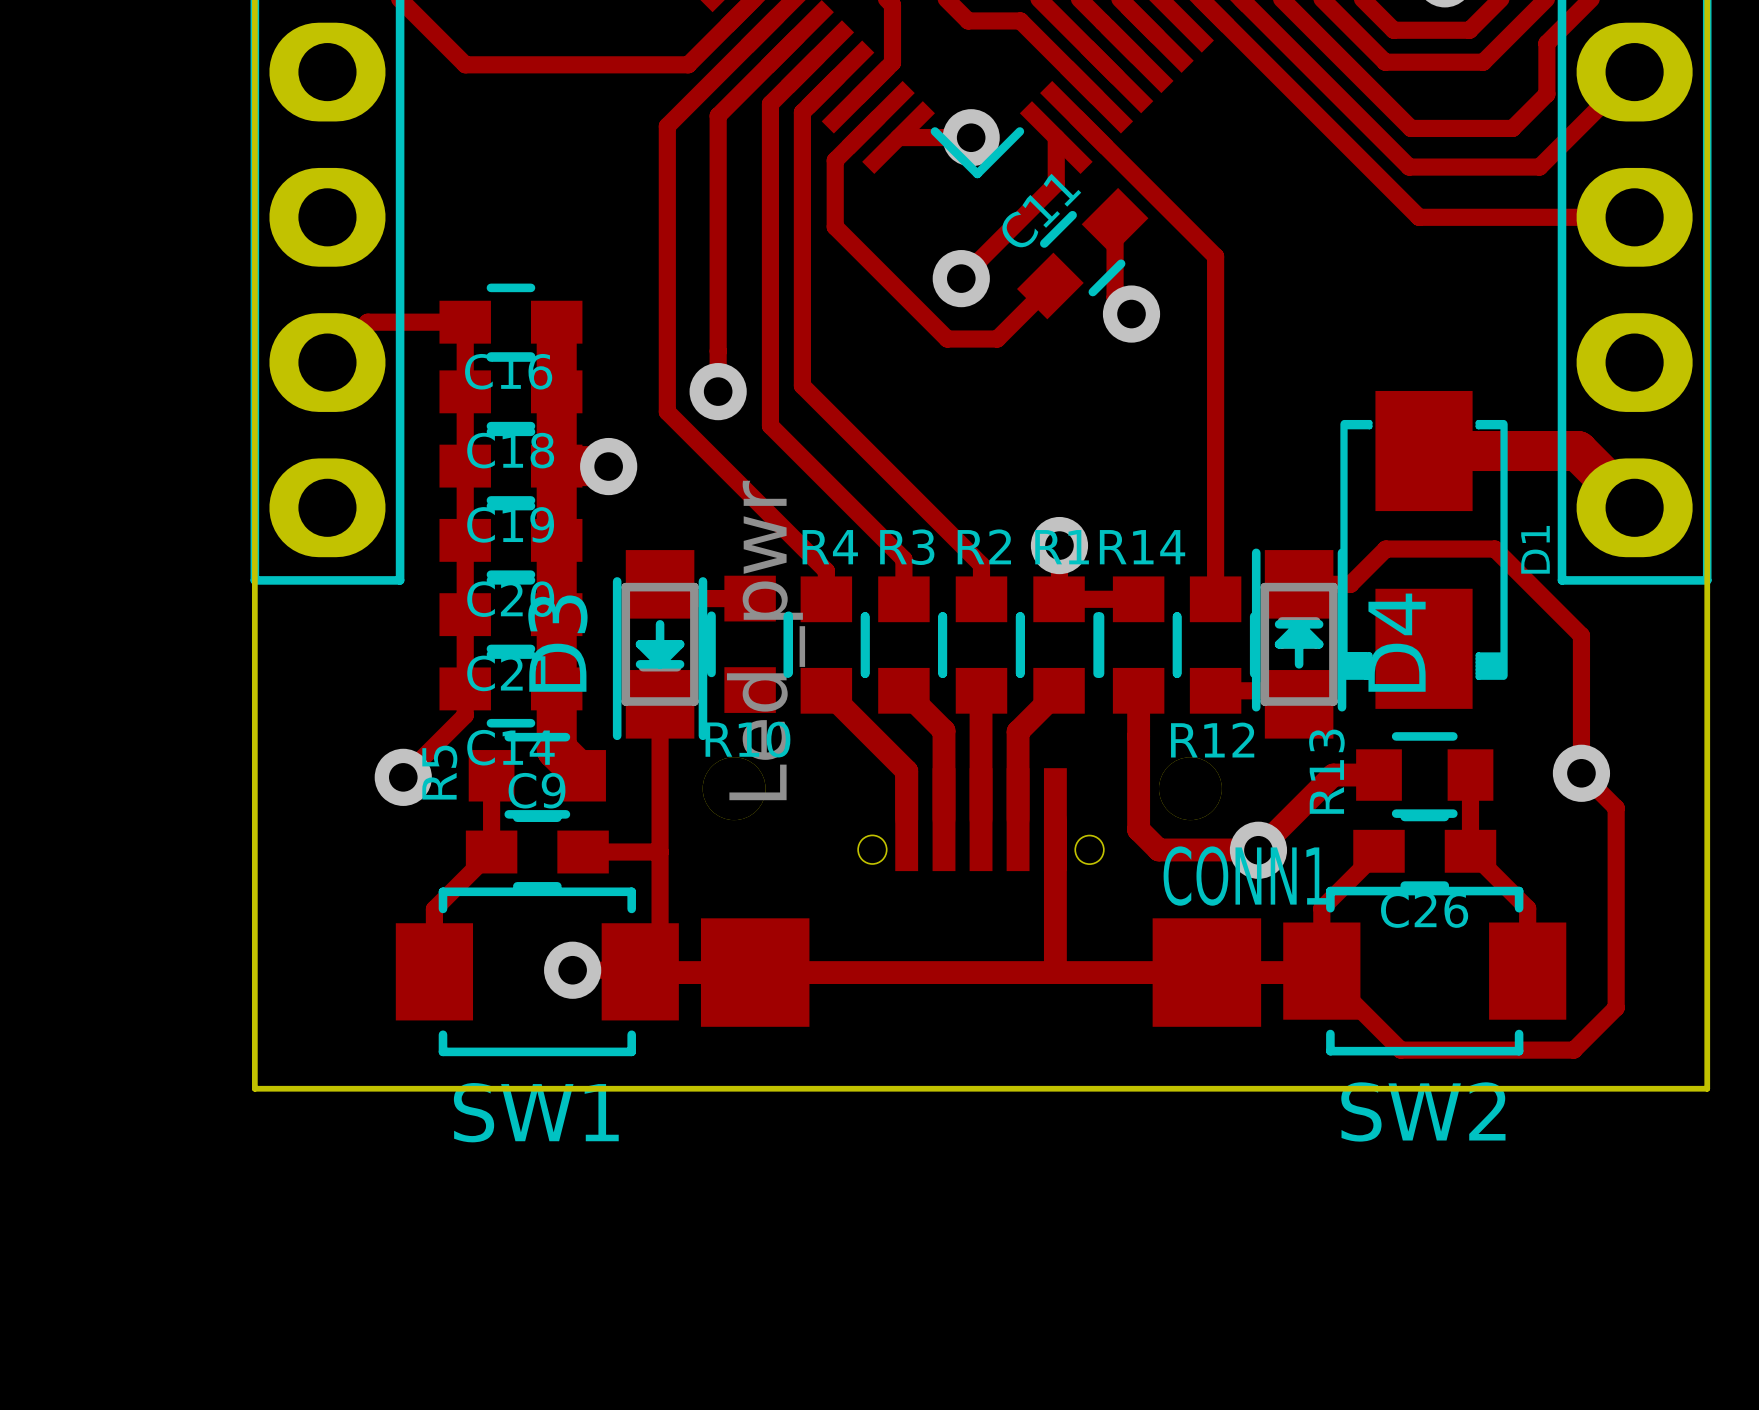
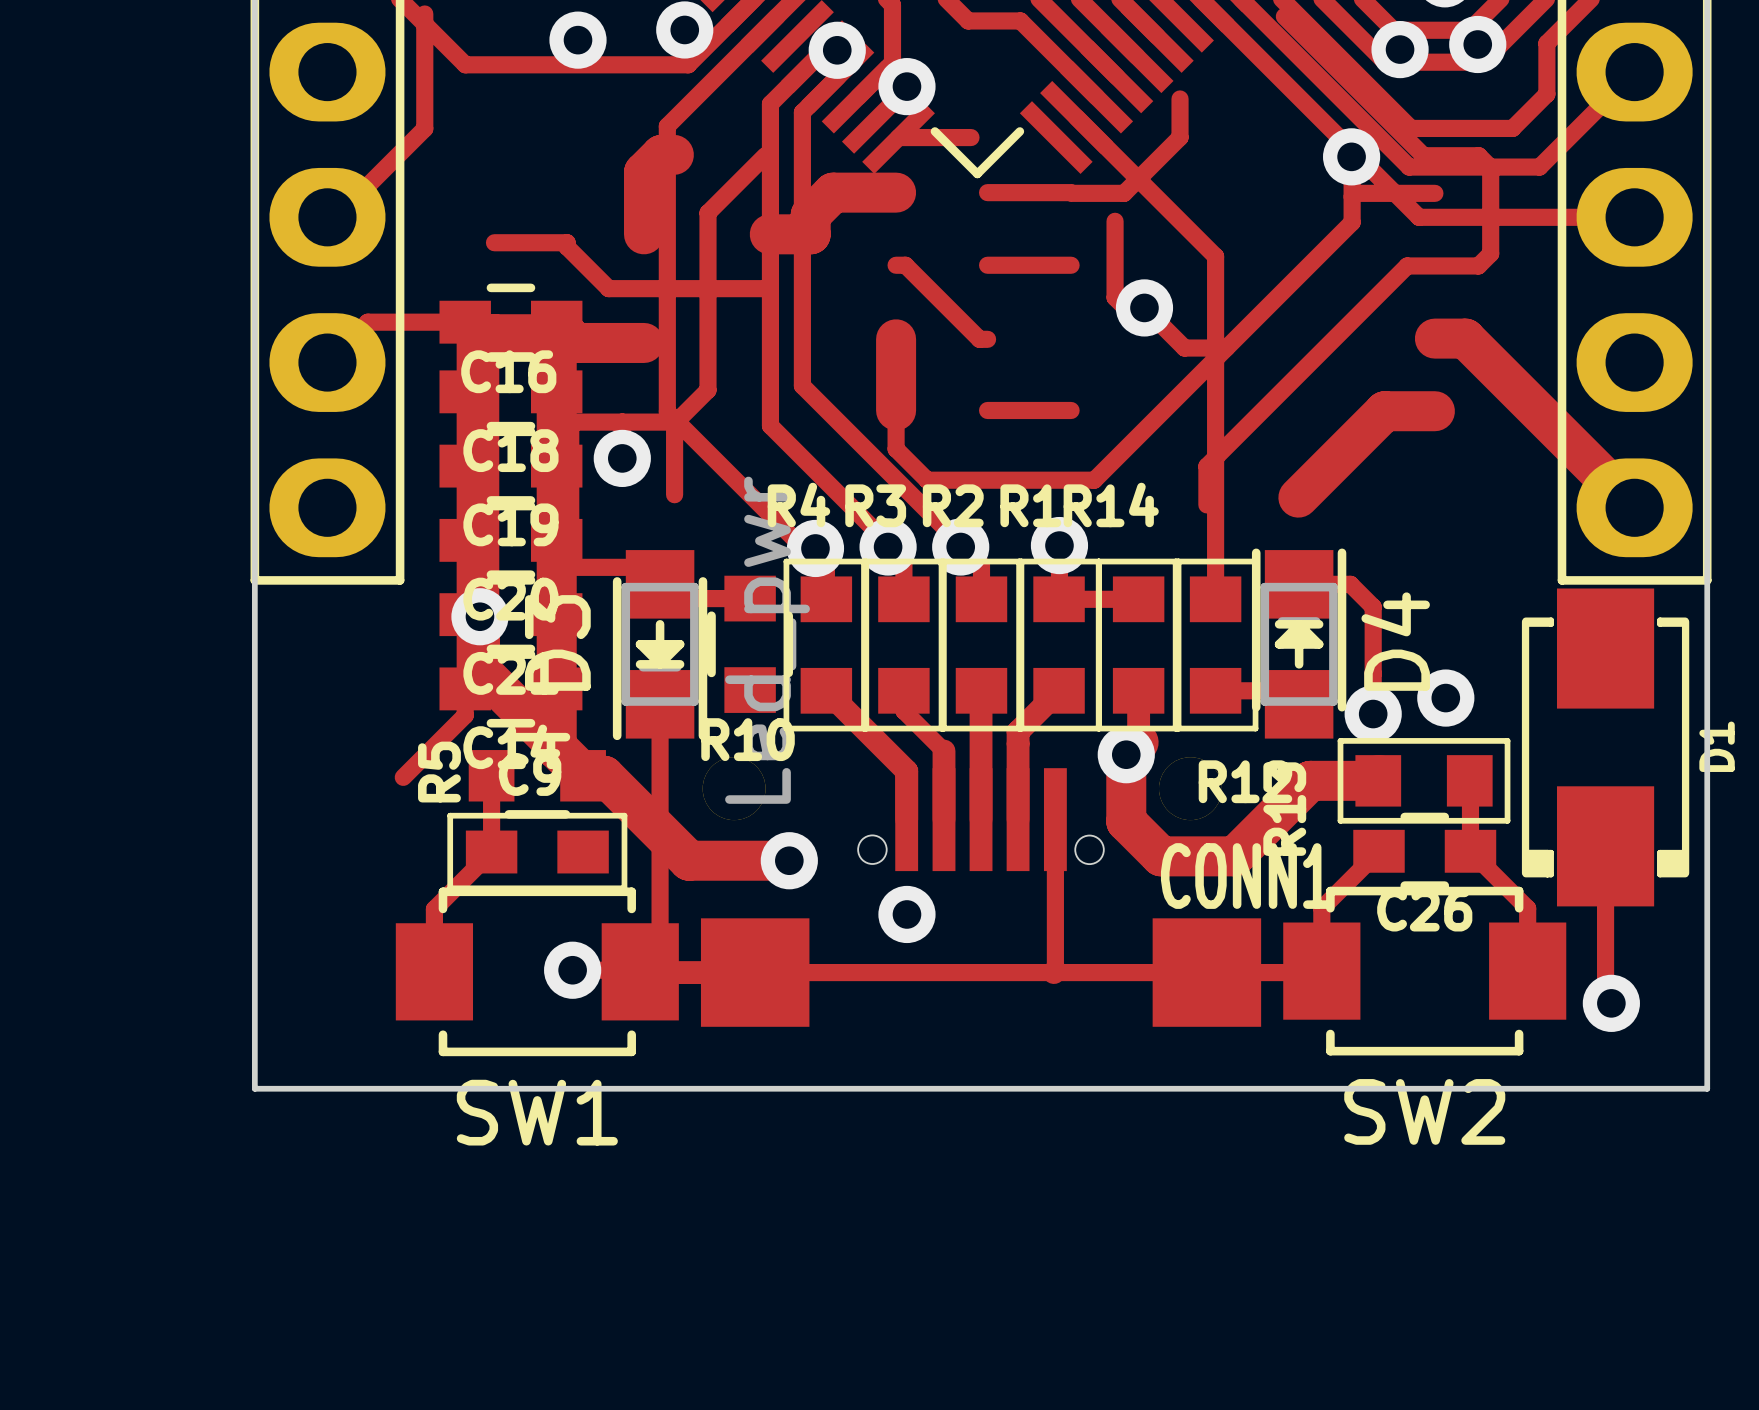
track: none -> (424, 13) (424, 128) (336, 217) (327, 217)
track: none -> (1284, 16) (1423, 155) (1478, 155) (1490, 167) (1490, 253) (1478, 265) (1407, 265) (1206, 466) (1206, 504)
via: none -> (684, 29)
track: (797, 36) (718, 115) (718, 391) -> none
via: none -> (578, 40)
via: none -> (1477, 44)
via: none -> (1400, 49)
via: none -> (837, 50)
via: none -> (906, 86)
track: none -> (1180, 98) (1180, 137) (1124, 193) (1071, 193)
track: (878, 117) (835, 160) (835, 226) (947, 339) (979, 339) -> (896, 265) (905, 265) (979, 339)
via: (971, 137) -> none
track: (1056, 137) (1056, 183) (961, 278) -> none
track: none -> (673, 154) (661, 154) (644, 172) (644, 234)
track: none -> (765, 155) (707, 212) (707, 390) (676, 422) (570, 422) (570, 567) (643, 567) (660, 584)
via: none -> (1351, 156)
track: none -> (1352, 157) (1352, 222) (1094, 480) (927, 480) (896, 449) (896, 339)
track: none -> (896, 189) (896, 192) (833, 192) (810, 215) (810, 234) (769, 234)
track: none -> (987, 192) (1071, 192)
track: none -> (1434, 193) (1355, 193) (1352, 196)
track: none -> (494, 242) (567, 242) (567, 247) (608, 288) (769, 288)
C11: (1082, 253) -> none
track: none -> (987, 265) (1071, 265)
via: (961, 278) -> none
track: (1050, 285) (997, 339) (987, 339) -> none
track: none -> (1144, 307) (1184, 348) (1226, 348)
via position: (1131, 314) -> (1144, 307)
track: none -> (644, 342) (575, 342) (567, 334) (494, 334) (479, 349) (479, 601)
via: (718, 391) -> none
track: none -> (987, 410) (1071, 410)
track: none -> (1434, 411) (1384, 411) (1298, 497)
track: none -> (674, 422) (674, 494)
track: (1424, 451) (1577, 451) -> (1434, 338) (1465, 338) (1577, 451)
via position: (608, 466) -> (622, 458)
via: none -> (888, 547)
via: none -> (960, 547)
via: none -> (815, 548)
D1 position: (1424, 549) -> (1605, 747)
R4 footprint: [783, 576, 870, 714] -> [783, 558, 870, 732]
R3 footprint: [861, 576, 947, 714] -> [861, 558, 947, 732]
R2 footprint: [938, 576, 1025, 714] -> [938, 558, 1025, 732]
R1 footprint: [1016, 576, 1102, 714] -> [1016, 558, 1102, 732]
R14 footprint: [1095, 576, 1182, 714] -> [1095, 558, 1182, 732]
R12 footprint: [1172, 576, 1259, 714] -> [1172, 558, 1259, 732]
track: (1350, 584) (1385, 549) (1494, 549) (1581, 635) (1581, 773) (1616, 807) (1616, 1007) (1573, 1050) (1400, 1050) (1321, 971) -> (1350, 584) (1373, 606) (1373, 714)
track: none -> (479, 602) (479, 669) (583, 772) (583, 775) (604, 775) (689, 860) (789, 860)
via: none -> (479, 616)
track: (903, 690) (944, 730) (944, 751) -> (903, 690) (903, 710) (944, 751)
via: none -> (1445, 698)
via: none -> (1373, 714)
R13 footprint: [1356, 732, 1494, 818] -> [1337, 738, 1511, 824]
track: (1138, 742) (1138, 829) (1158, 849) (1258, 849) (1333, 775) (1379, 775) -> (1138, 742) (1126, 754) (1126, 821) (1161, 856) (1234, 856) (1310, 780) (1373, 780) (1379, 775)
via: none -> (1126, 754)
via: (1581, 773) -> none
via: (403, 777) -> none
C9 footprint: [465, 813, 609, 891] -> [447, 812, 628, 892]
track width: thick (1055, 819) (1055, 971) -> thin (1055, 819) (1055, 971)
track: none -> (1605, 846) (1605, 997) (1611, 1003)
via: (1258, 850) -> none
track: (583, 852) (660, 852) -> none
via: none -> (789, 860)
via: none -> (906, 914)
track width: thick (1321, 971) (755, 972) -> thin (1321, 971) (755, 972)
via: none -> (1611, 1003)

